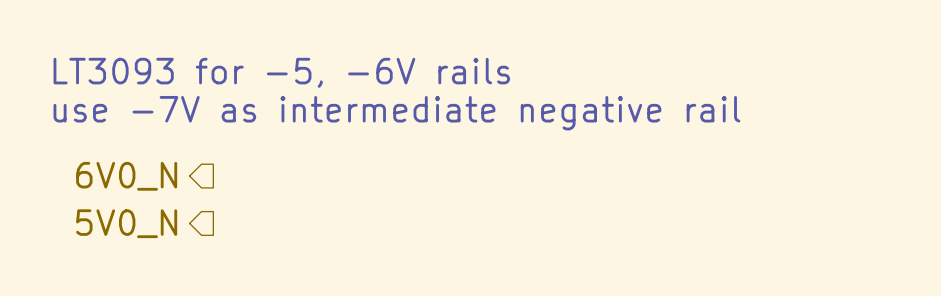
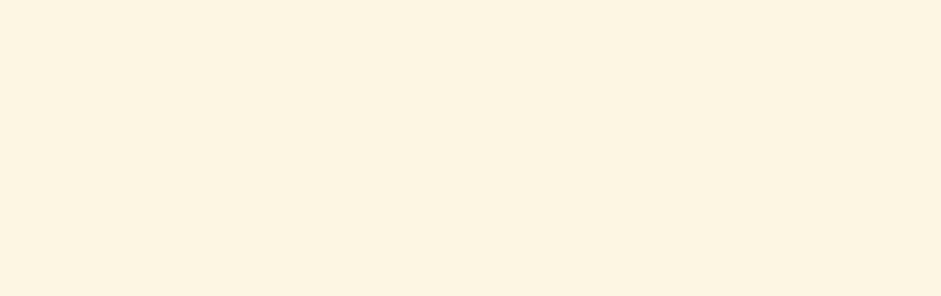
text: LT3093 for -5, -6V rails (281, 72) -> none
text: use -7V as intermediate negative rail (396, 113) -> none
hierarchical label: 6V0_N (126, 176) -> none
hierarchical label: 5V0_N (126, 223) -> none

